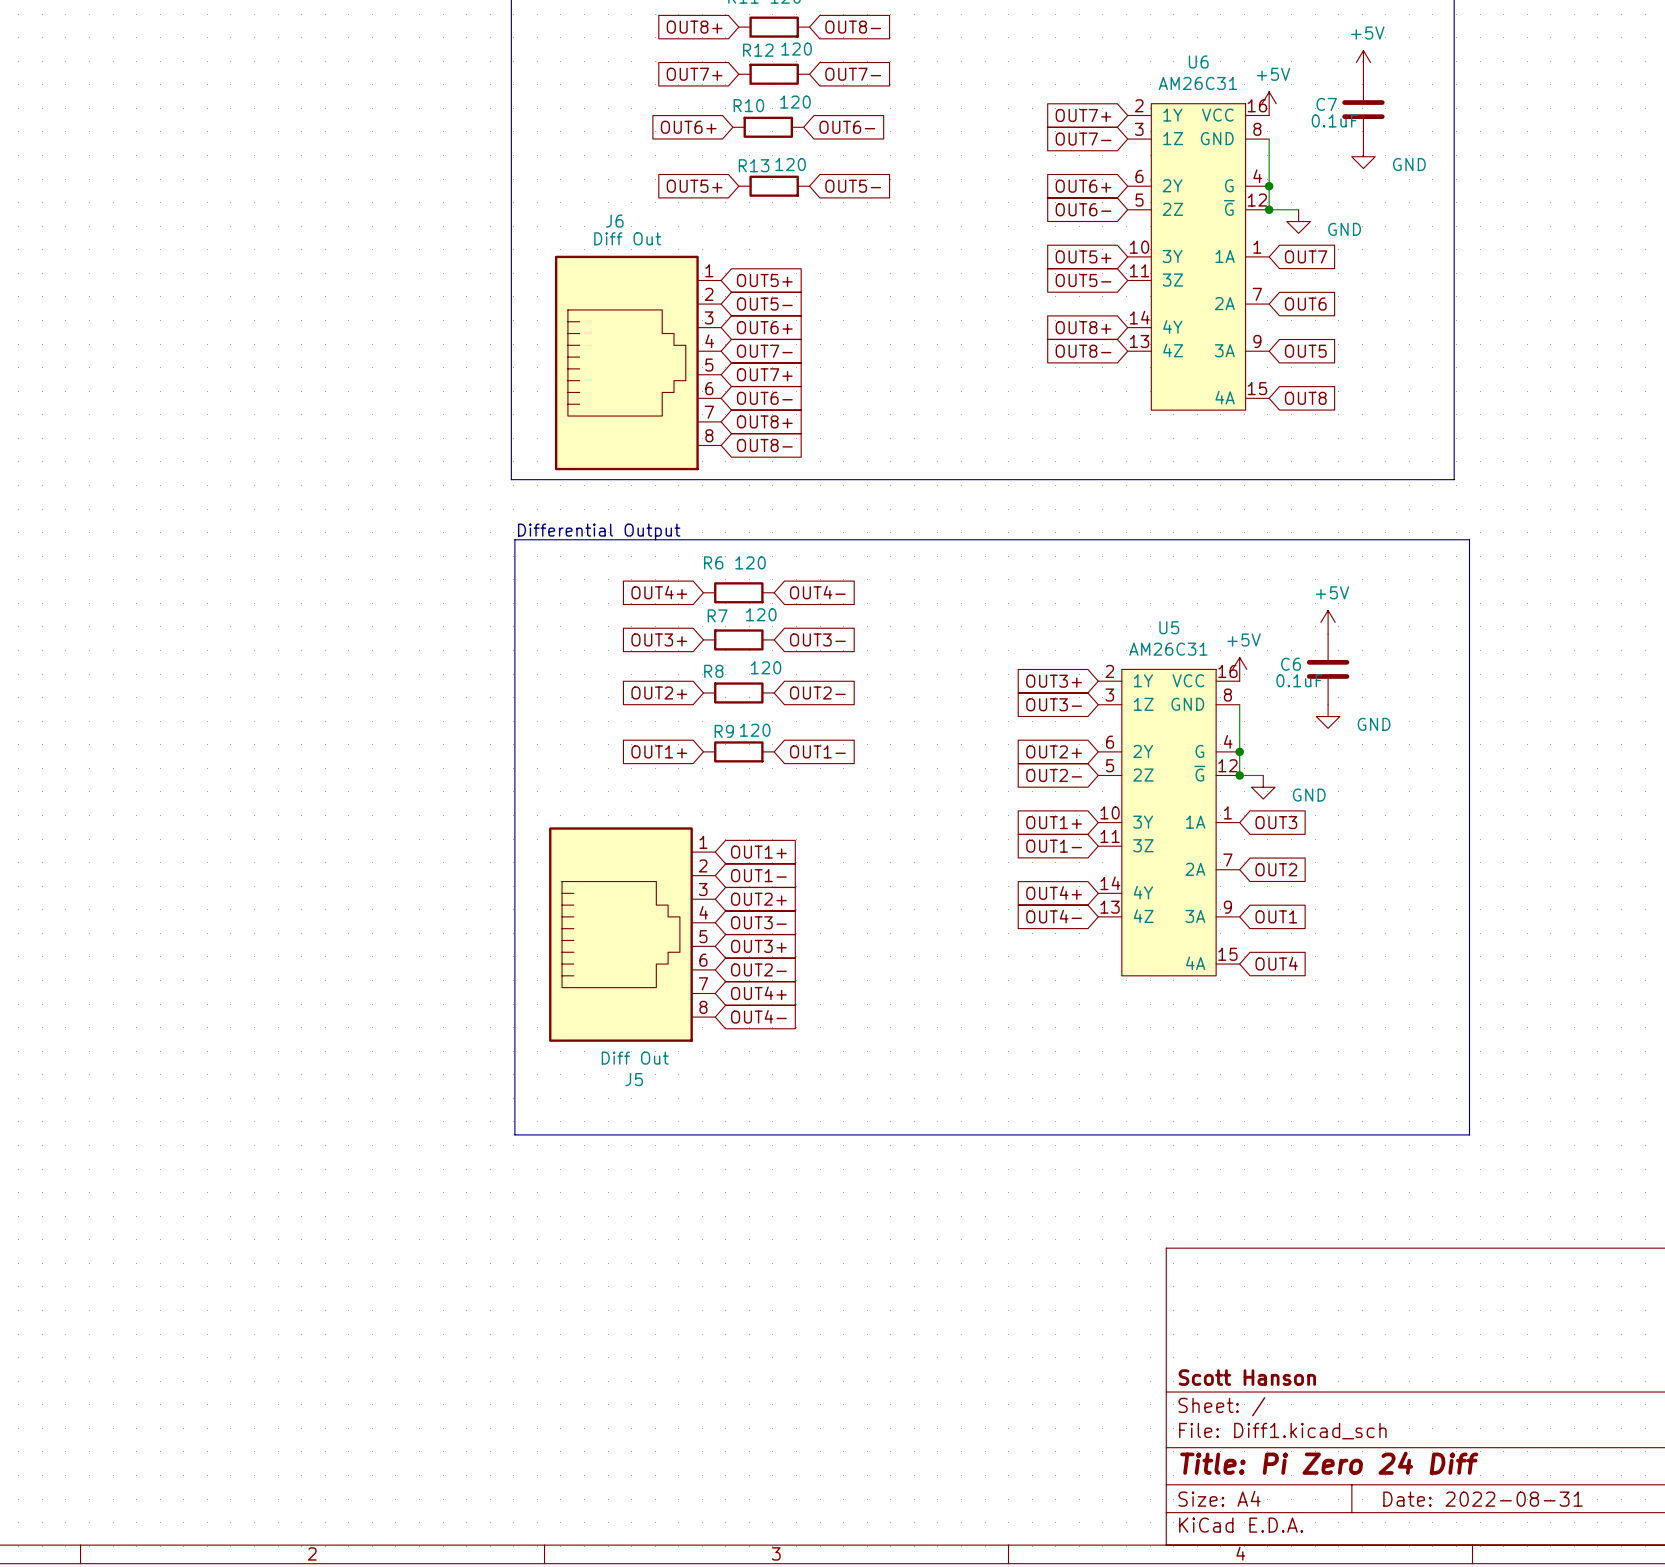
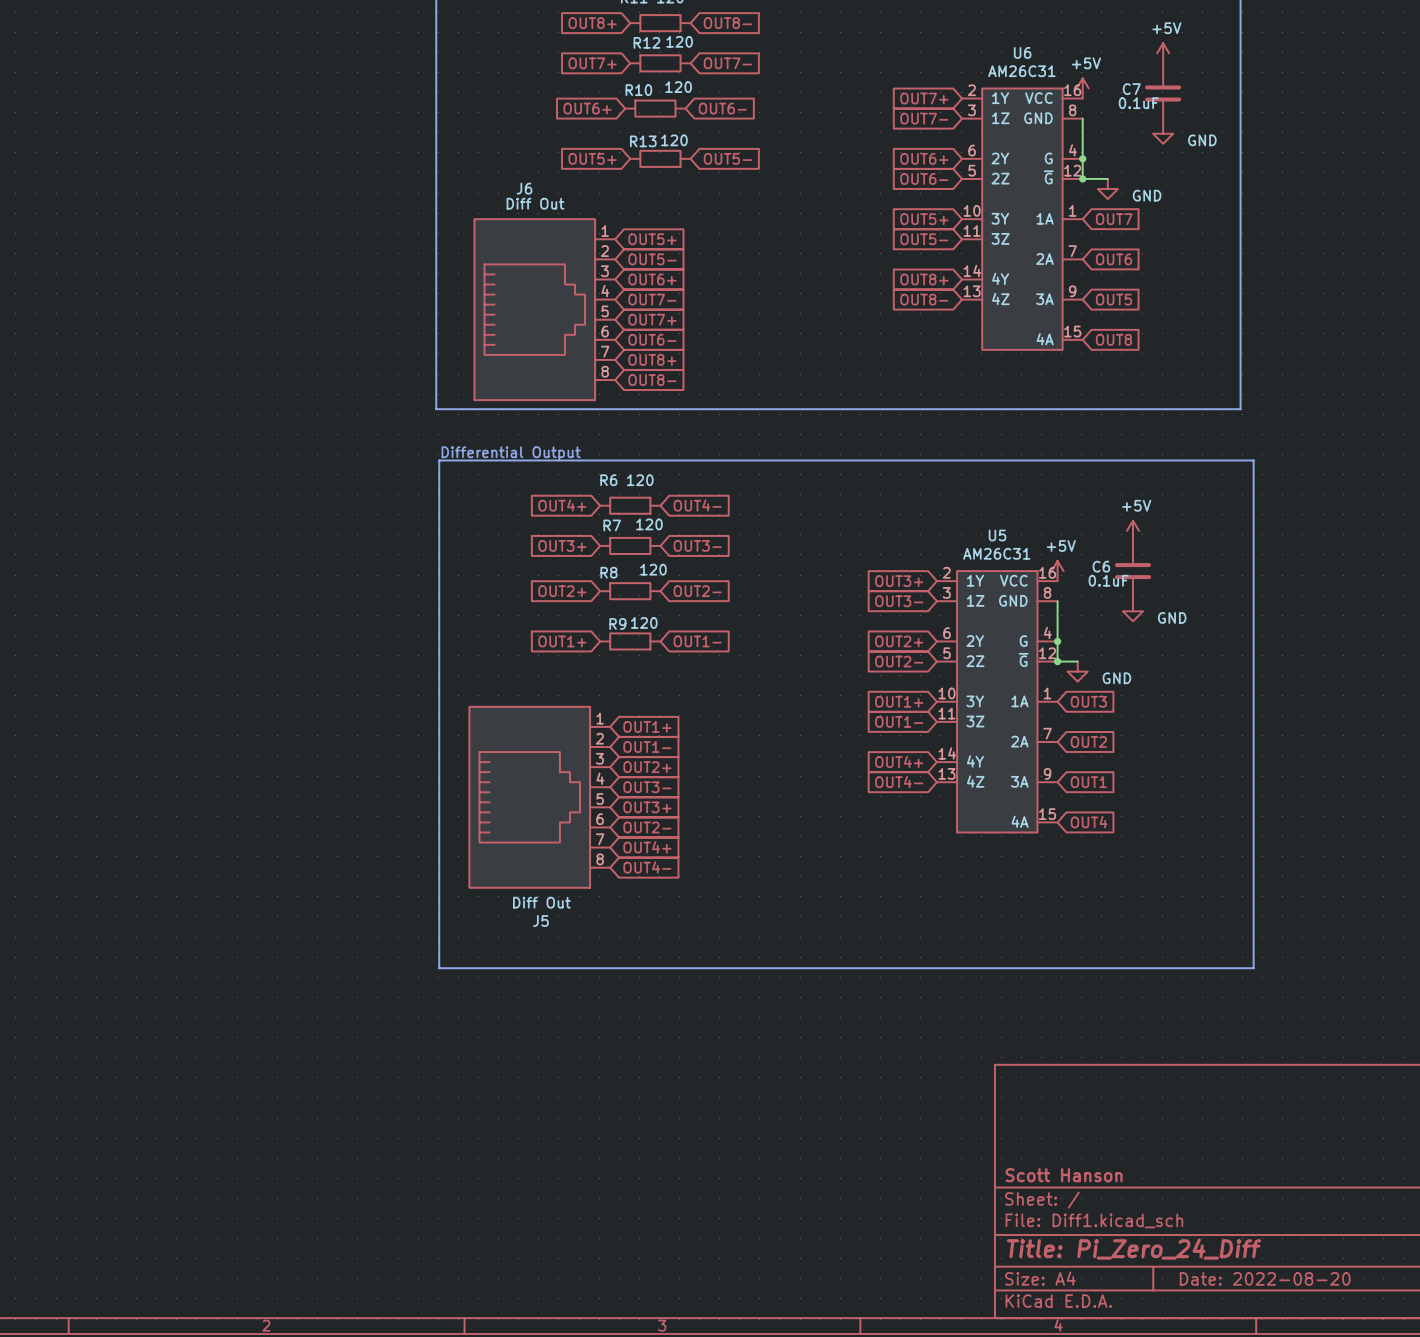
title block: Title: Pi Zero 24 Diff (1329, 1463) -> Title: Pi_Zero_24_Diff (1133, 1249)
title block: Date: 2022-08-31 (1483, 1499) -> Date: 2022-08-20 (1265, 1278)

